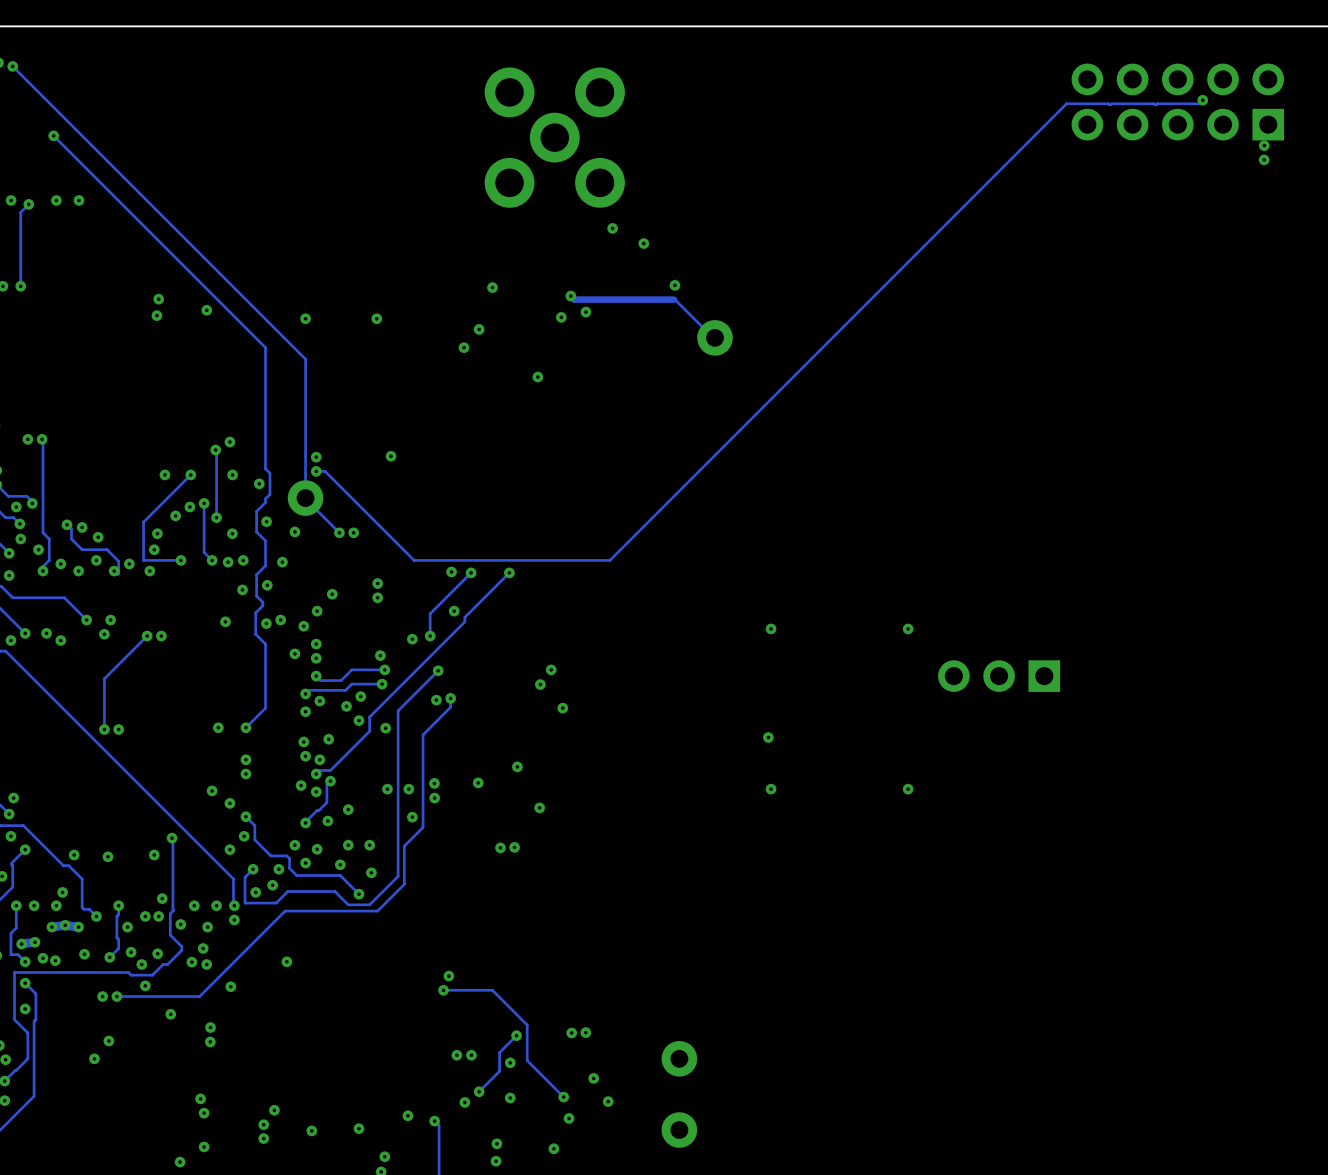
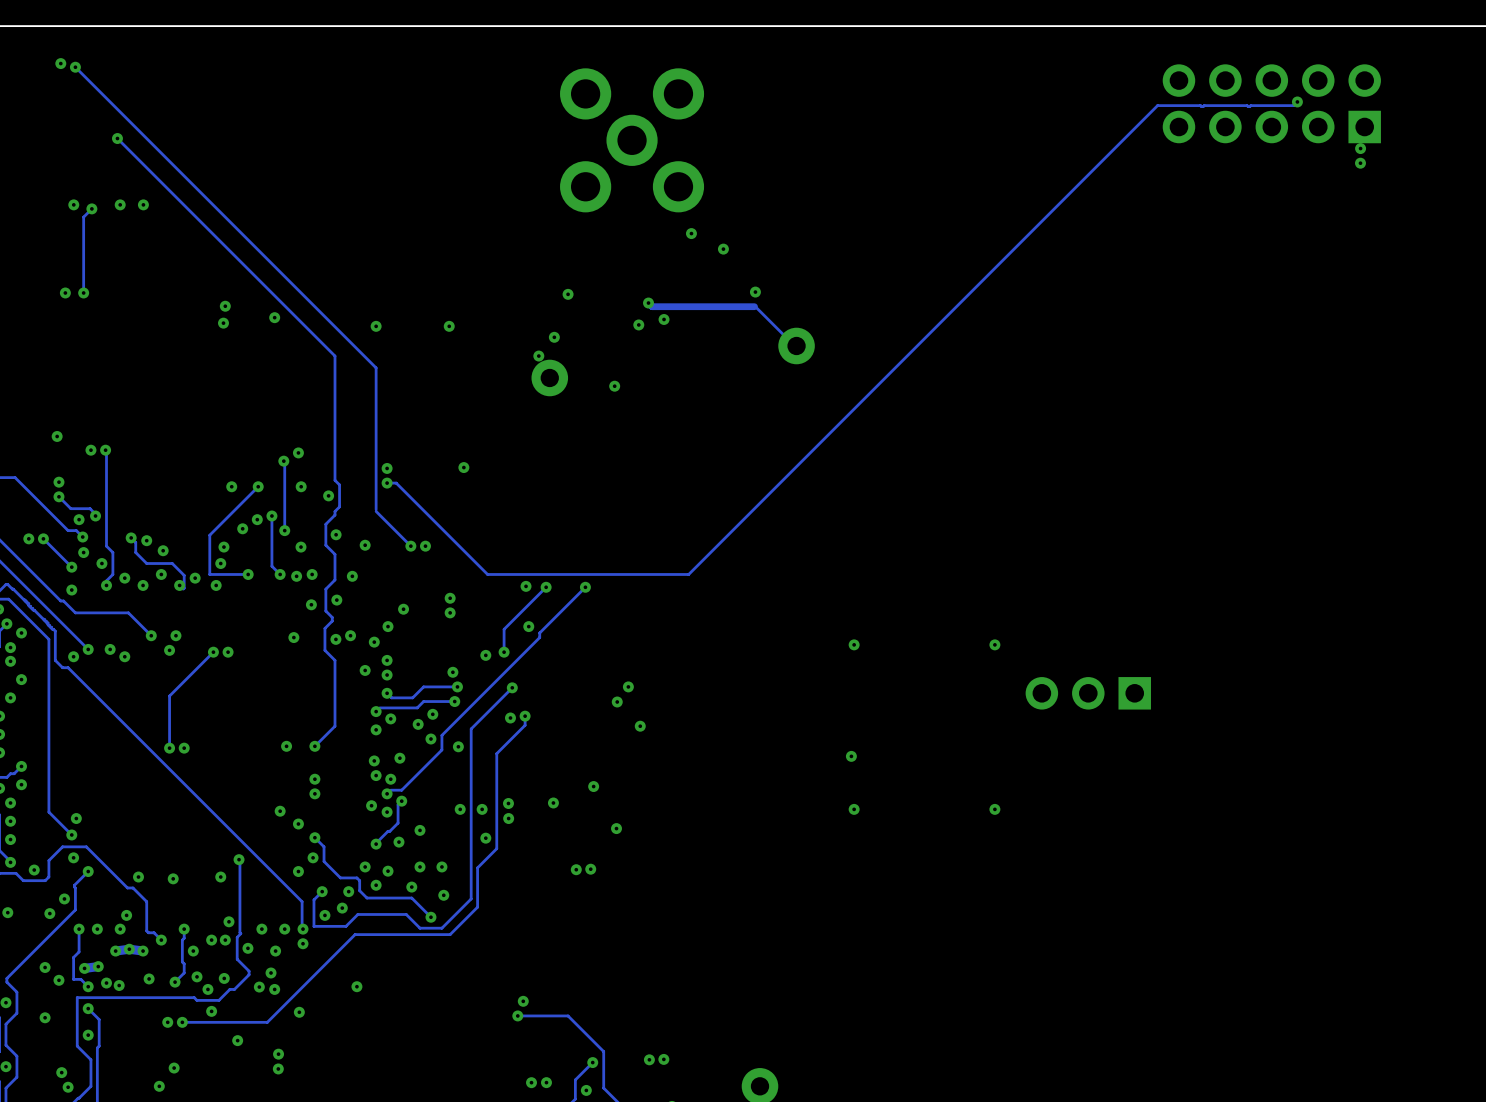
part position: (305, 498) -> (549, 377)

